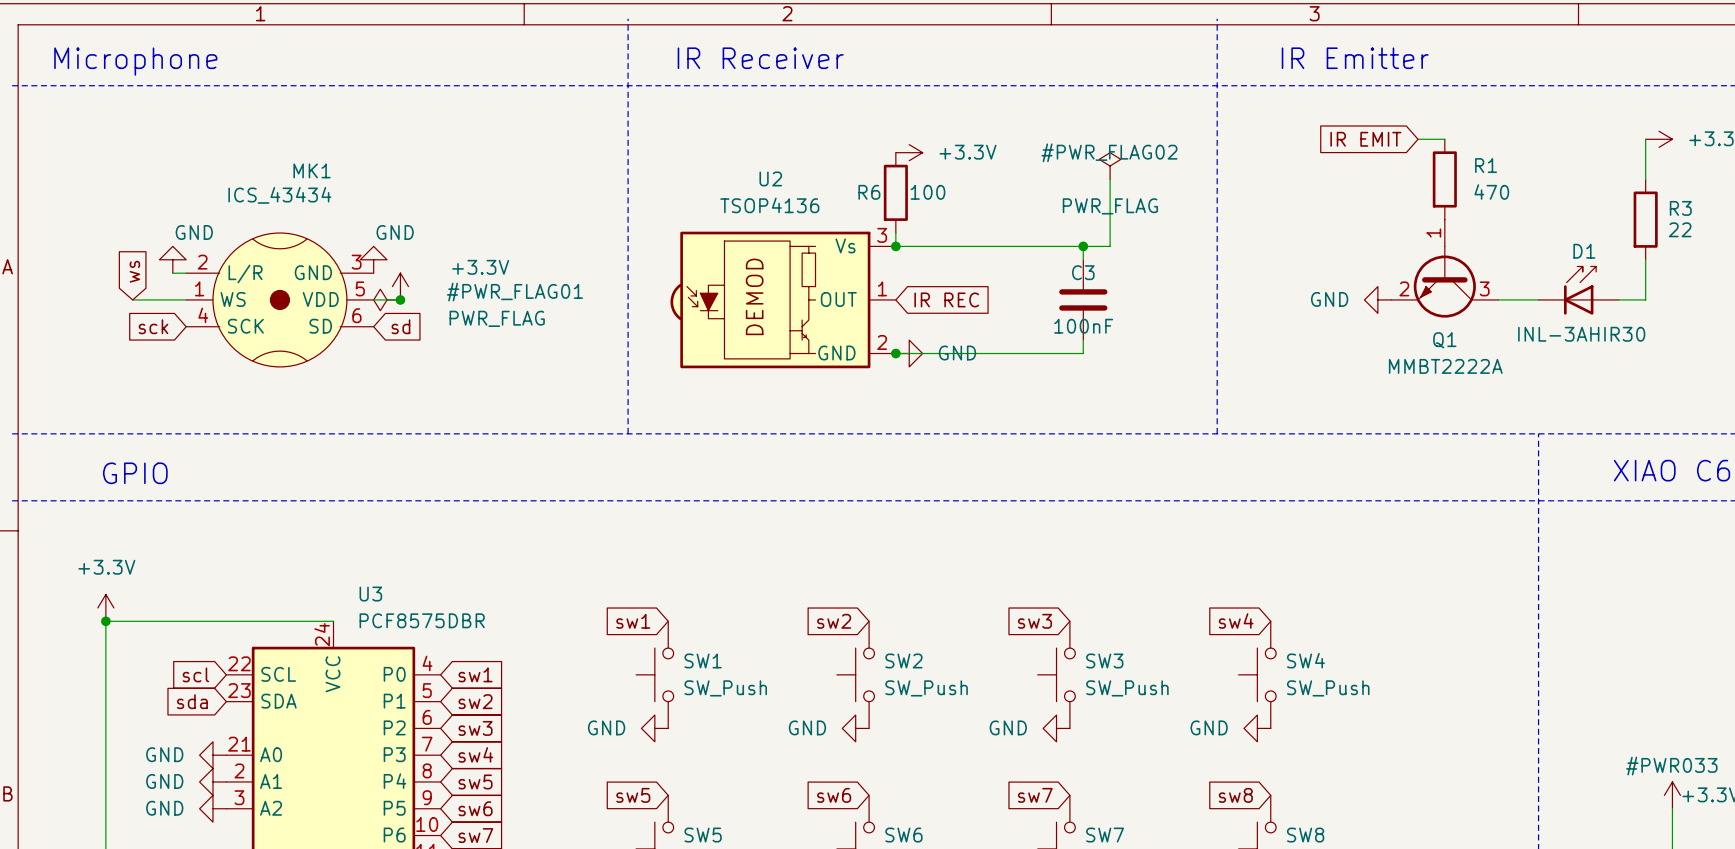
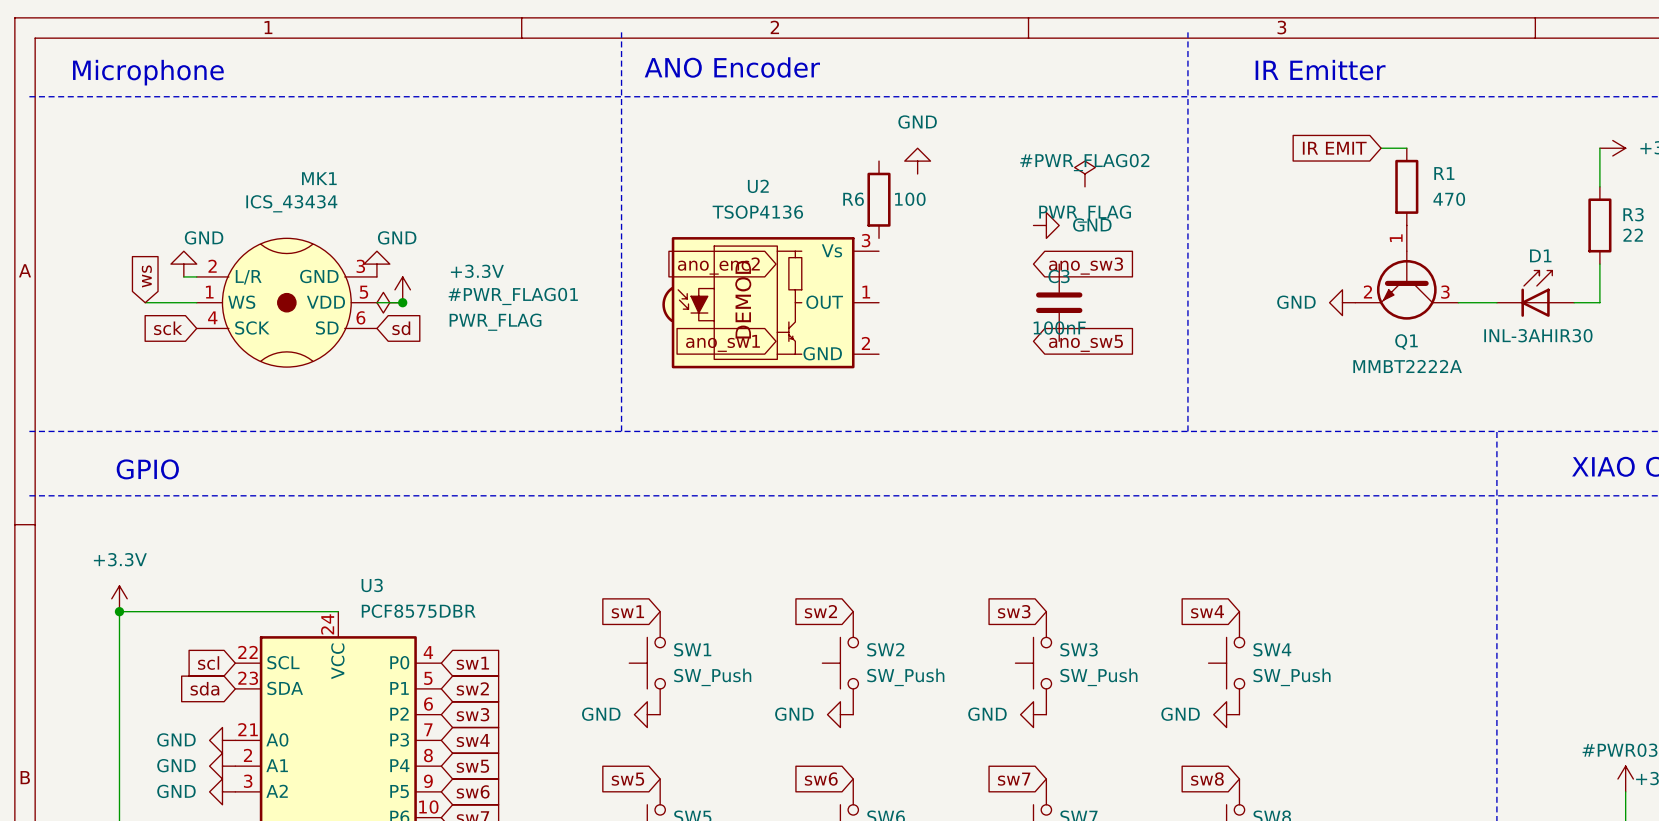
text: none -> ANO Encoder (732, 67)
text: IR Receiver (760, 58) -> none
power symbol: +3.3V (909, 152) -> none
power symbol: none -> GND (917, 161)
wire: (1110, 179) (1110, 246) (895, 246) (895, 233) -> none
power symbol: none -> GND (1046, 225)
junction: (895, 246) -> none
wire: (1083, 246) (1083, 259) -> none
junction: (1083, 246) -> none
global label: none -> ano_enc2 (718, 266)
global label: none -> ano_sw3 (1086, 266)
global label: IR REC (946, 299) -> none
global label: none -> ano_sw1 (722, 343)
wire: (1083, 340) (1083, 353) (895, 353) -> none
global label: none -> ano_sw5 (1085, 343)
junction: (895, 353) -> none
power symbol: GND (909, 353) -> none

